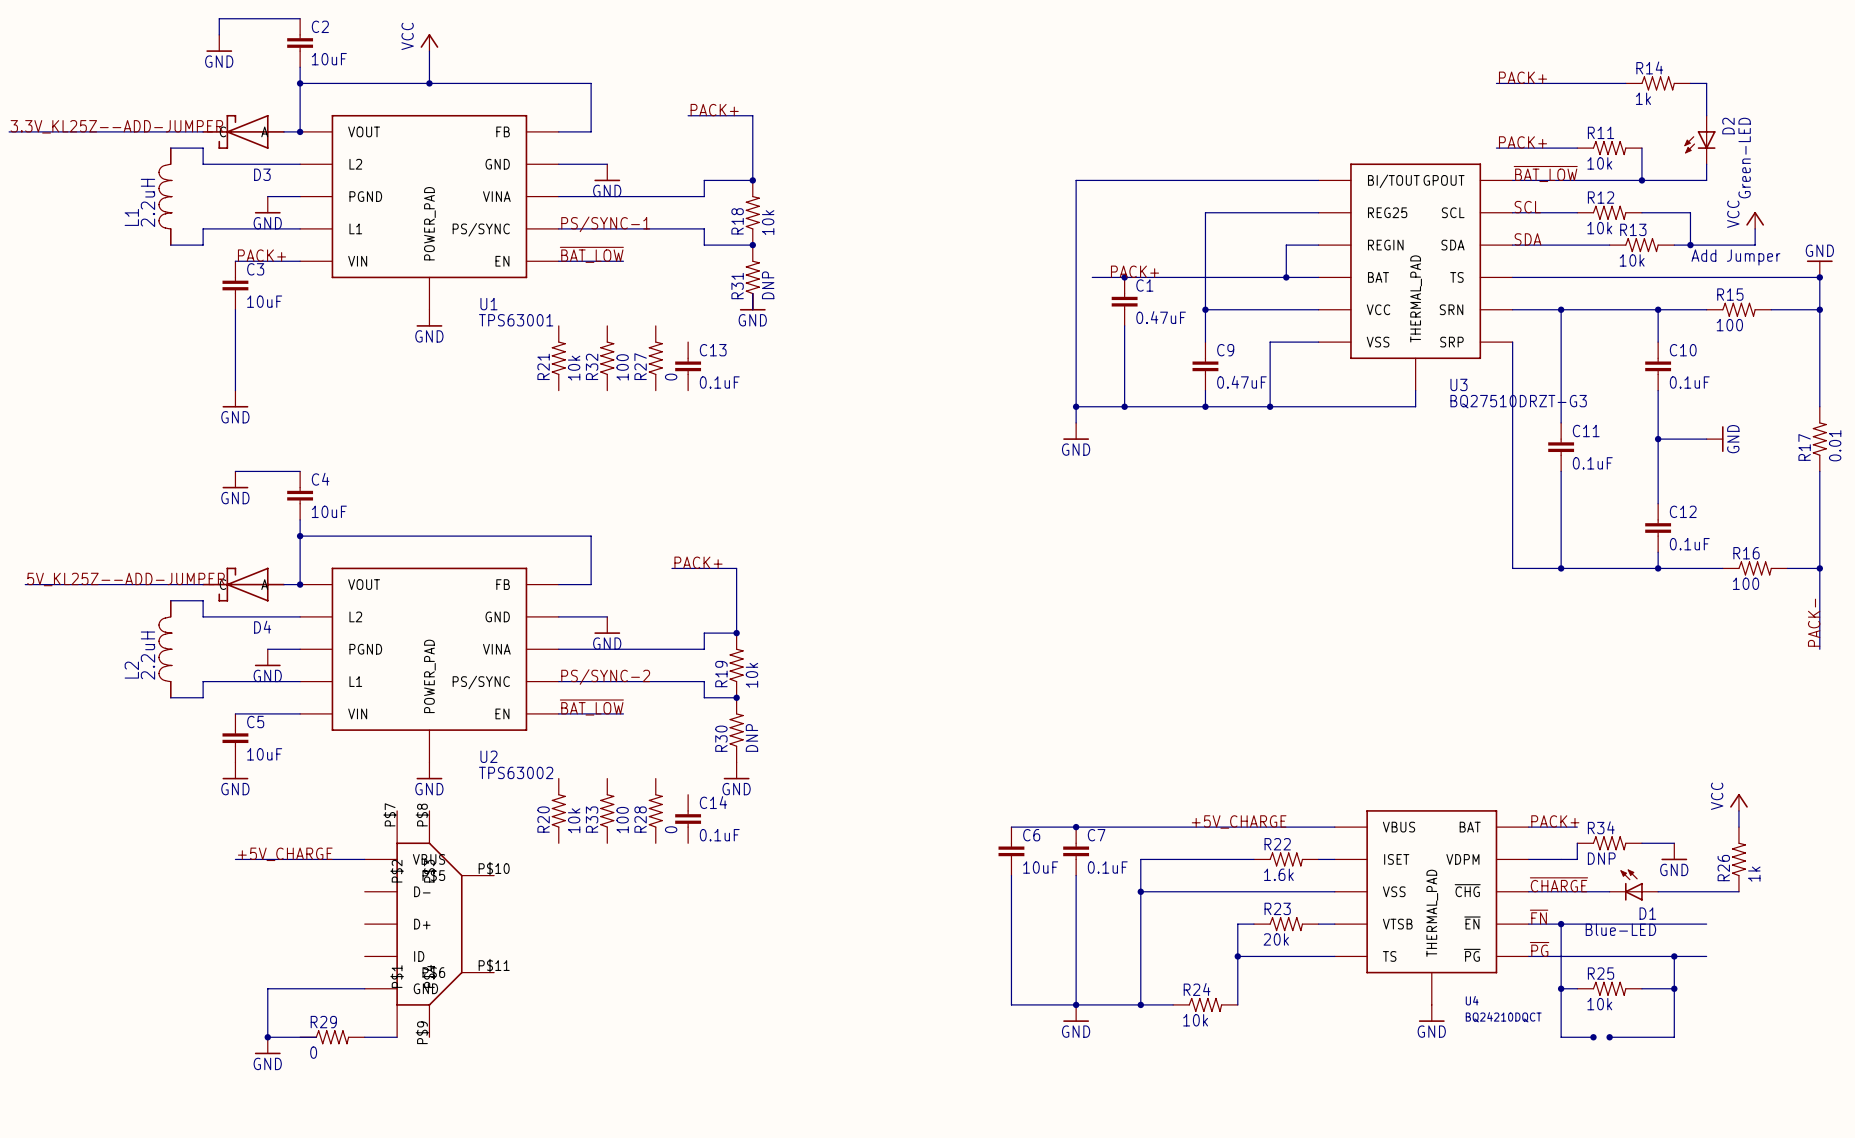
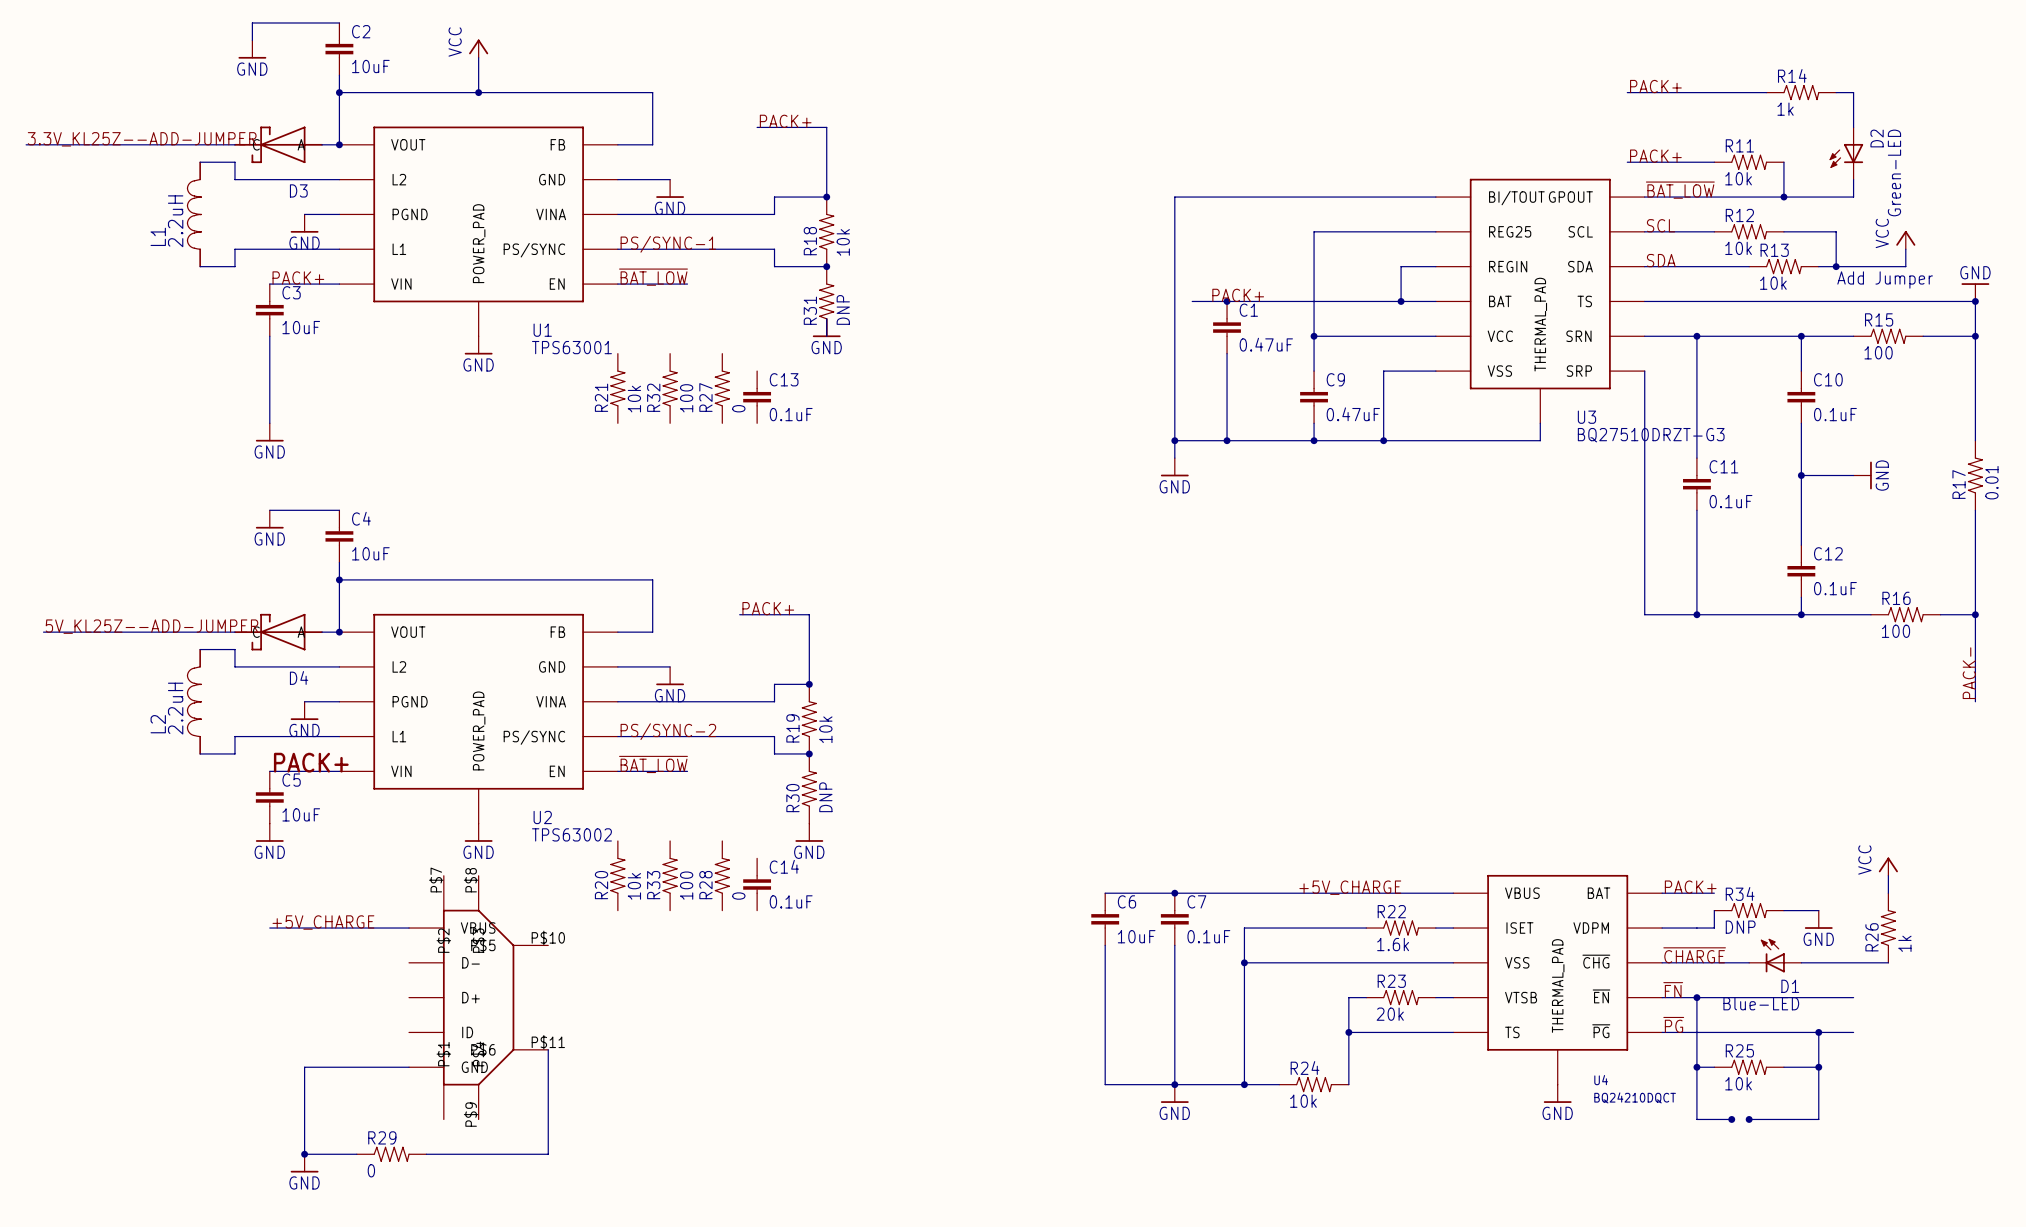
label: none -> PACK+ (311, 762)
wire: none -> (548, 1049) (548, 1154) (426, 1154)
wire: (267, 1037) (316, 1037) -> (304, 1119) (304, 1154) (356, 1154)
junction position: (267, 1037) -> (304, 1154)
R29 position: (332, 1037) -> (391, 1154)
wire: (364, 1037) (397, 1037) -> none
power symbol position: GND (267, 1045) -> GND (304, 1163)

